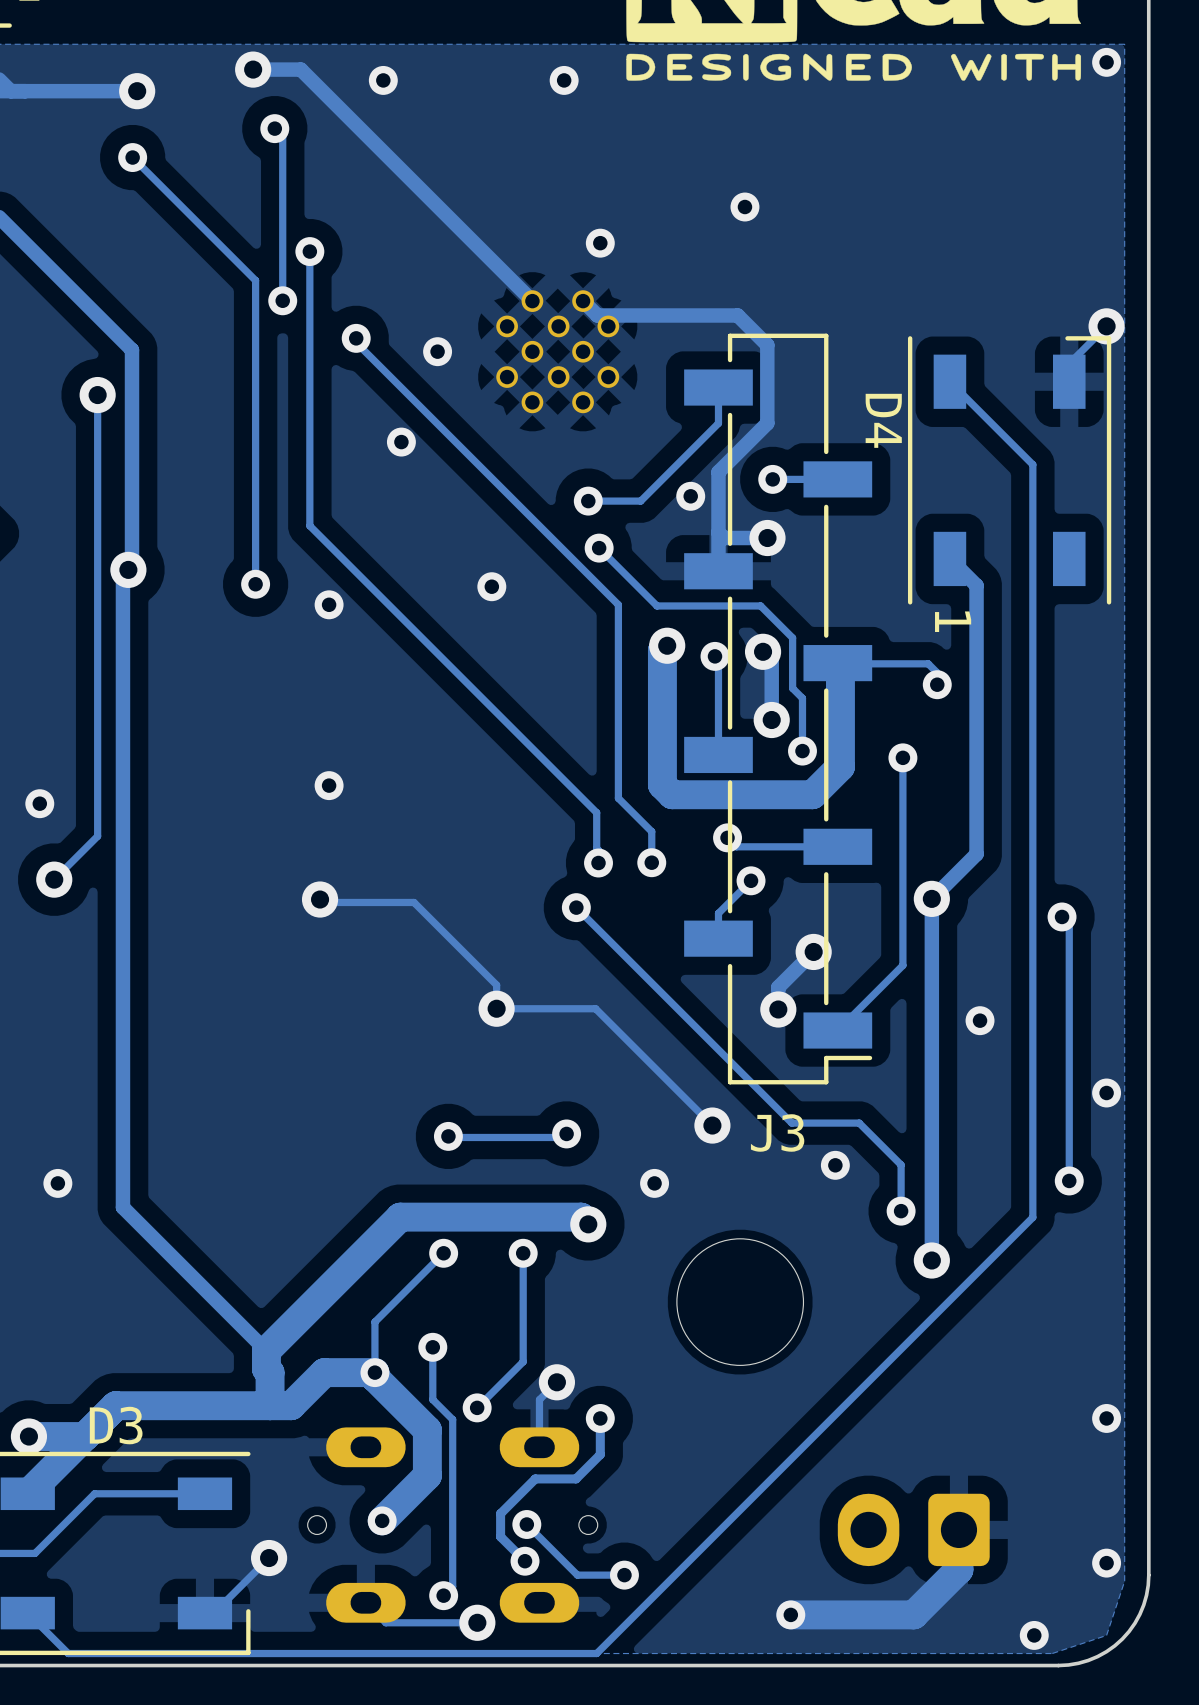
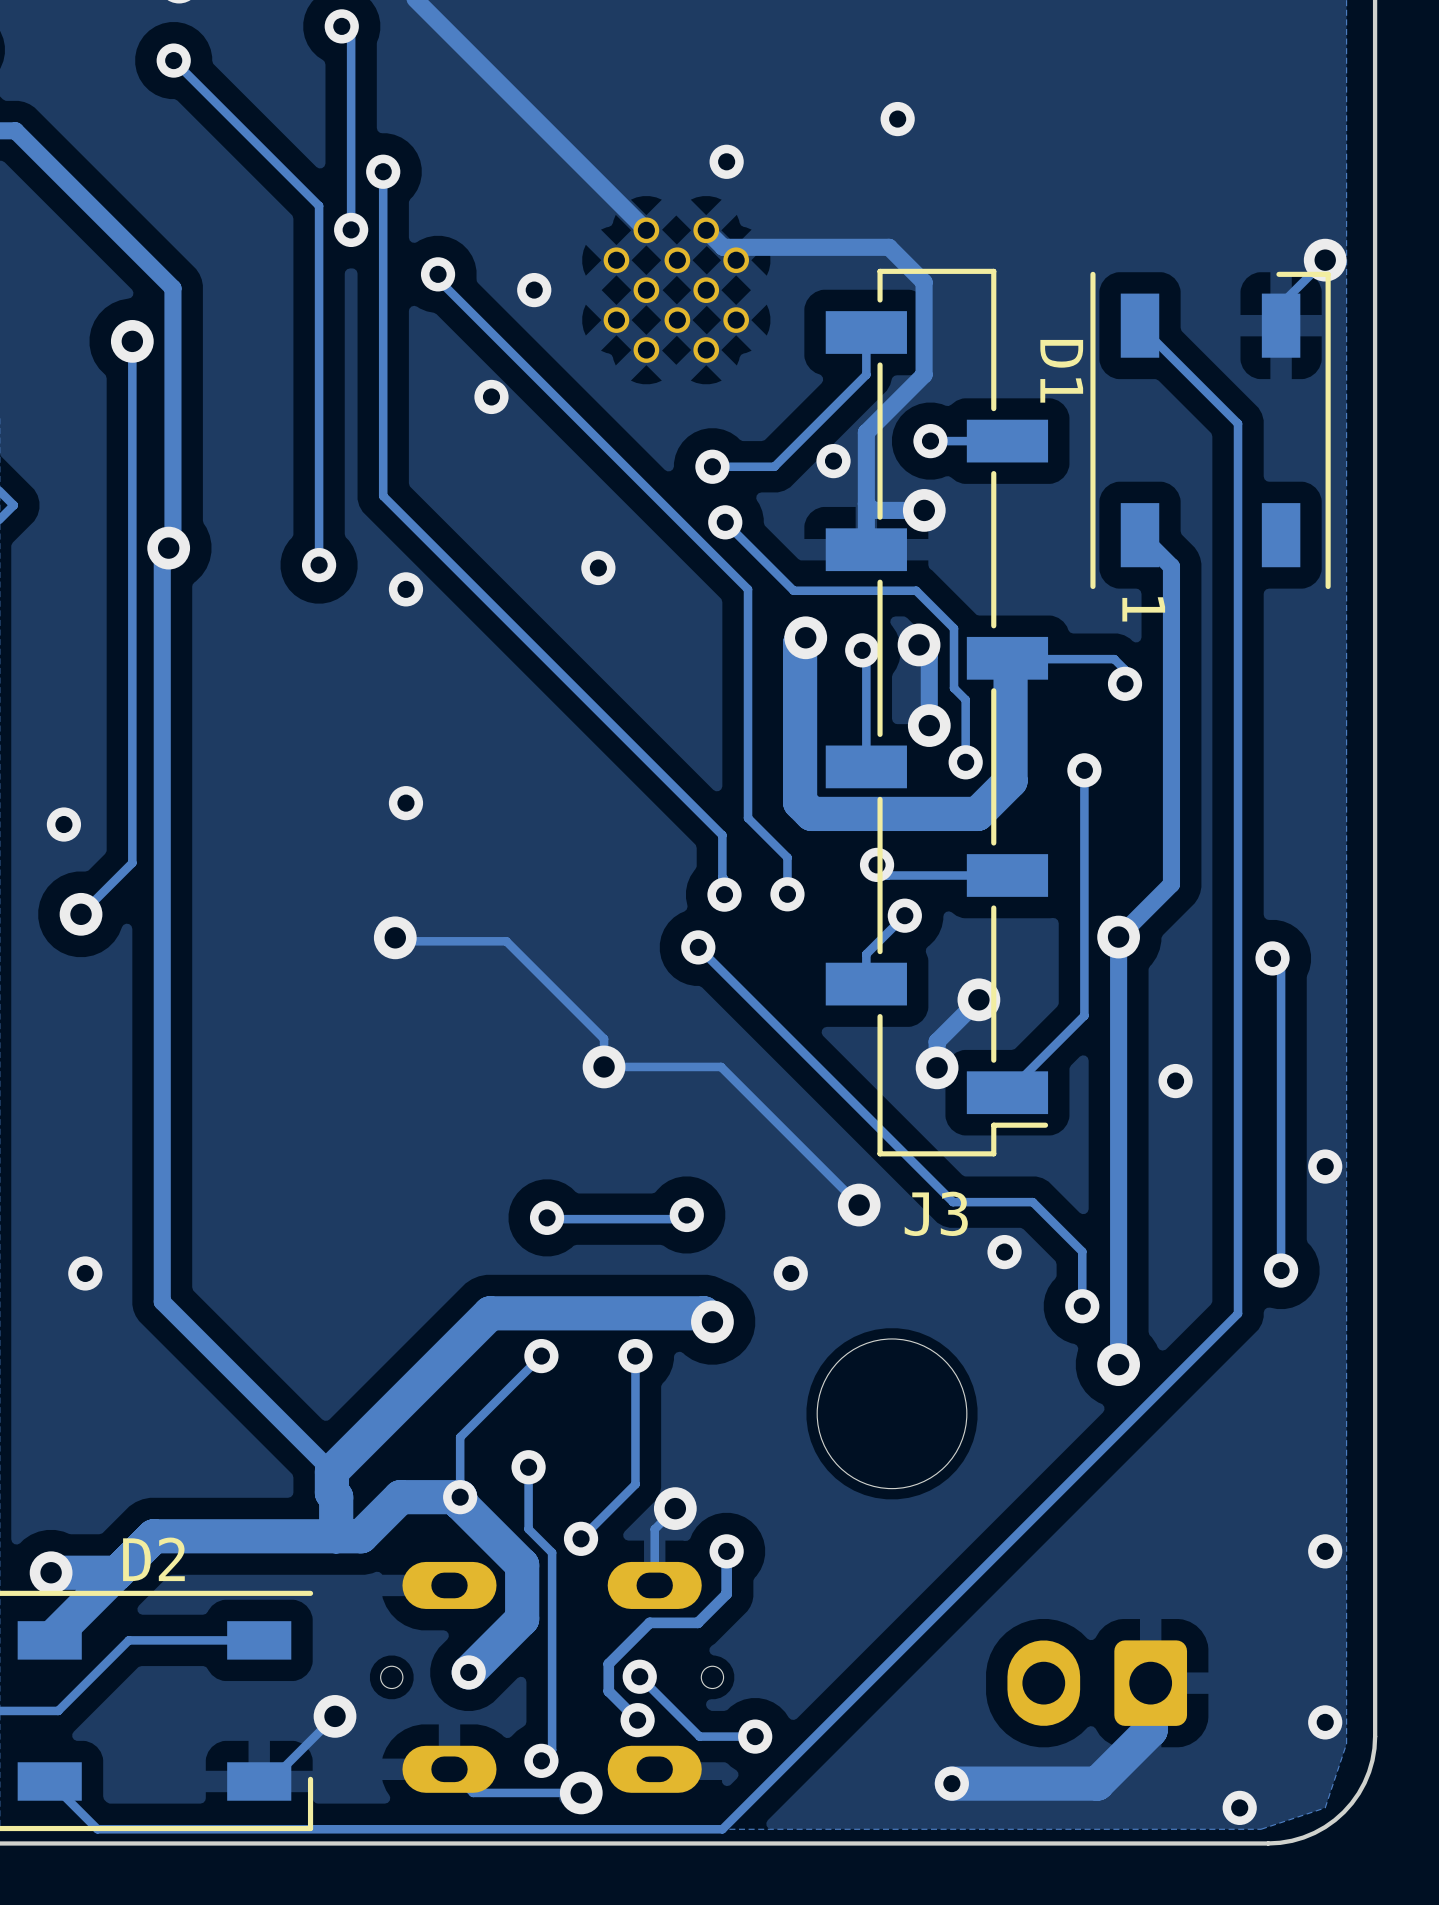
D4 name: D4 (883, 420) -> D1 (1061, 371)
D3 name: D3 (116, 1425) -> D2 (153, 1559)

